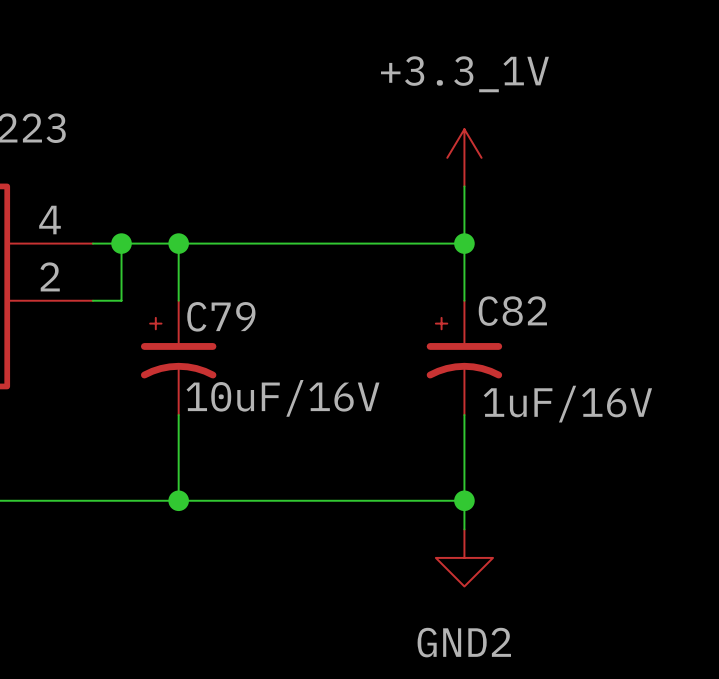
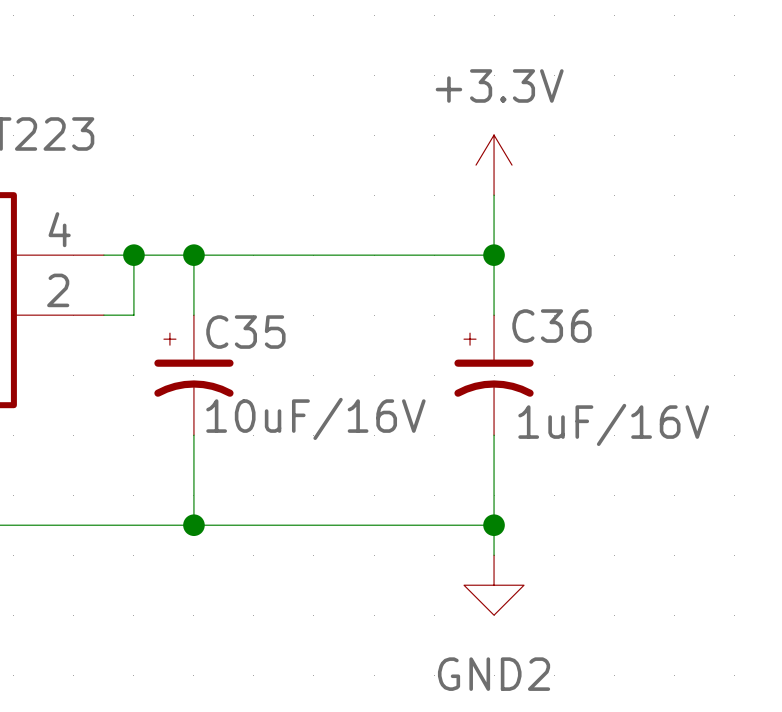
power symbol: +3.3_1V (464, 157) -> +3.3V (494, 165)
C82 name: C82 (512, 311) -> C36 (551, 326)
C79 name: C79 (221, 316) -> C35 (245, 332)

